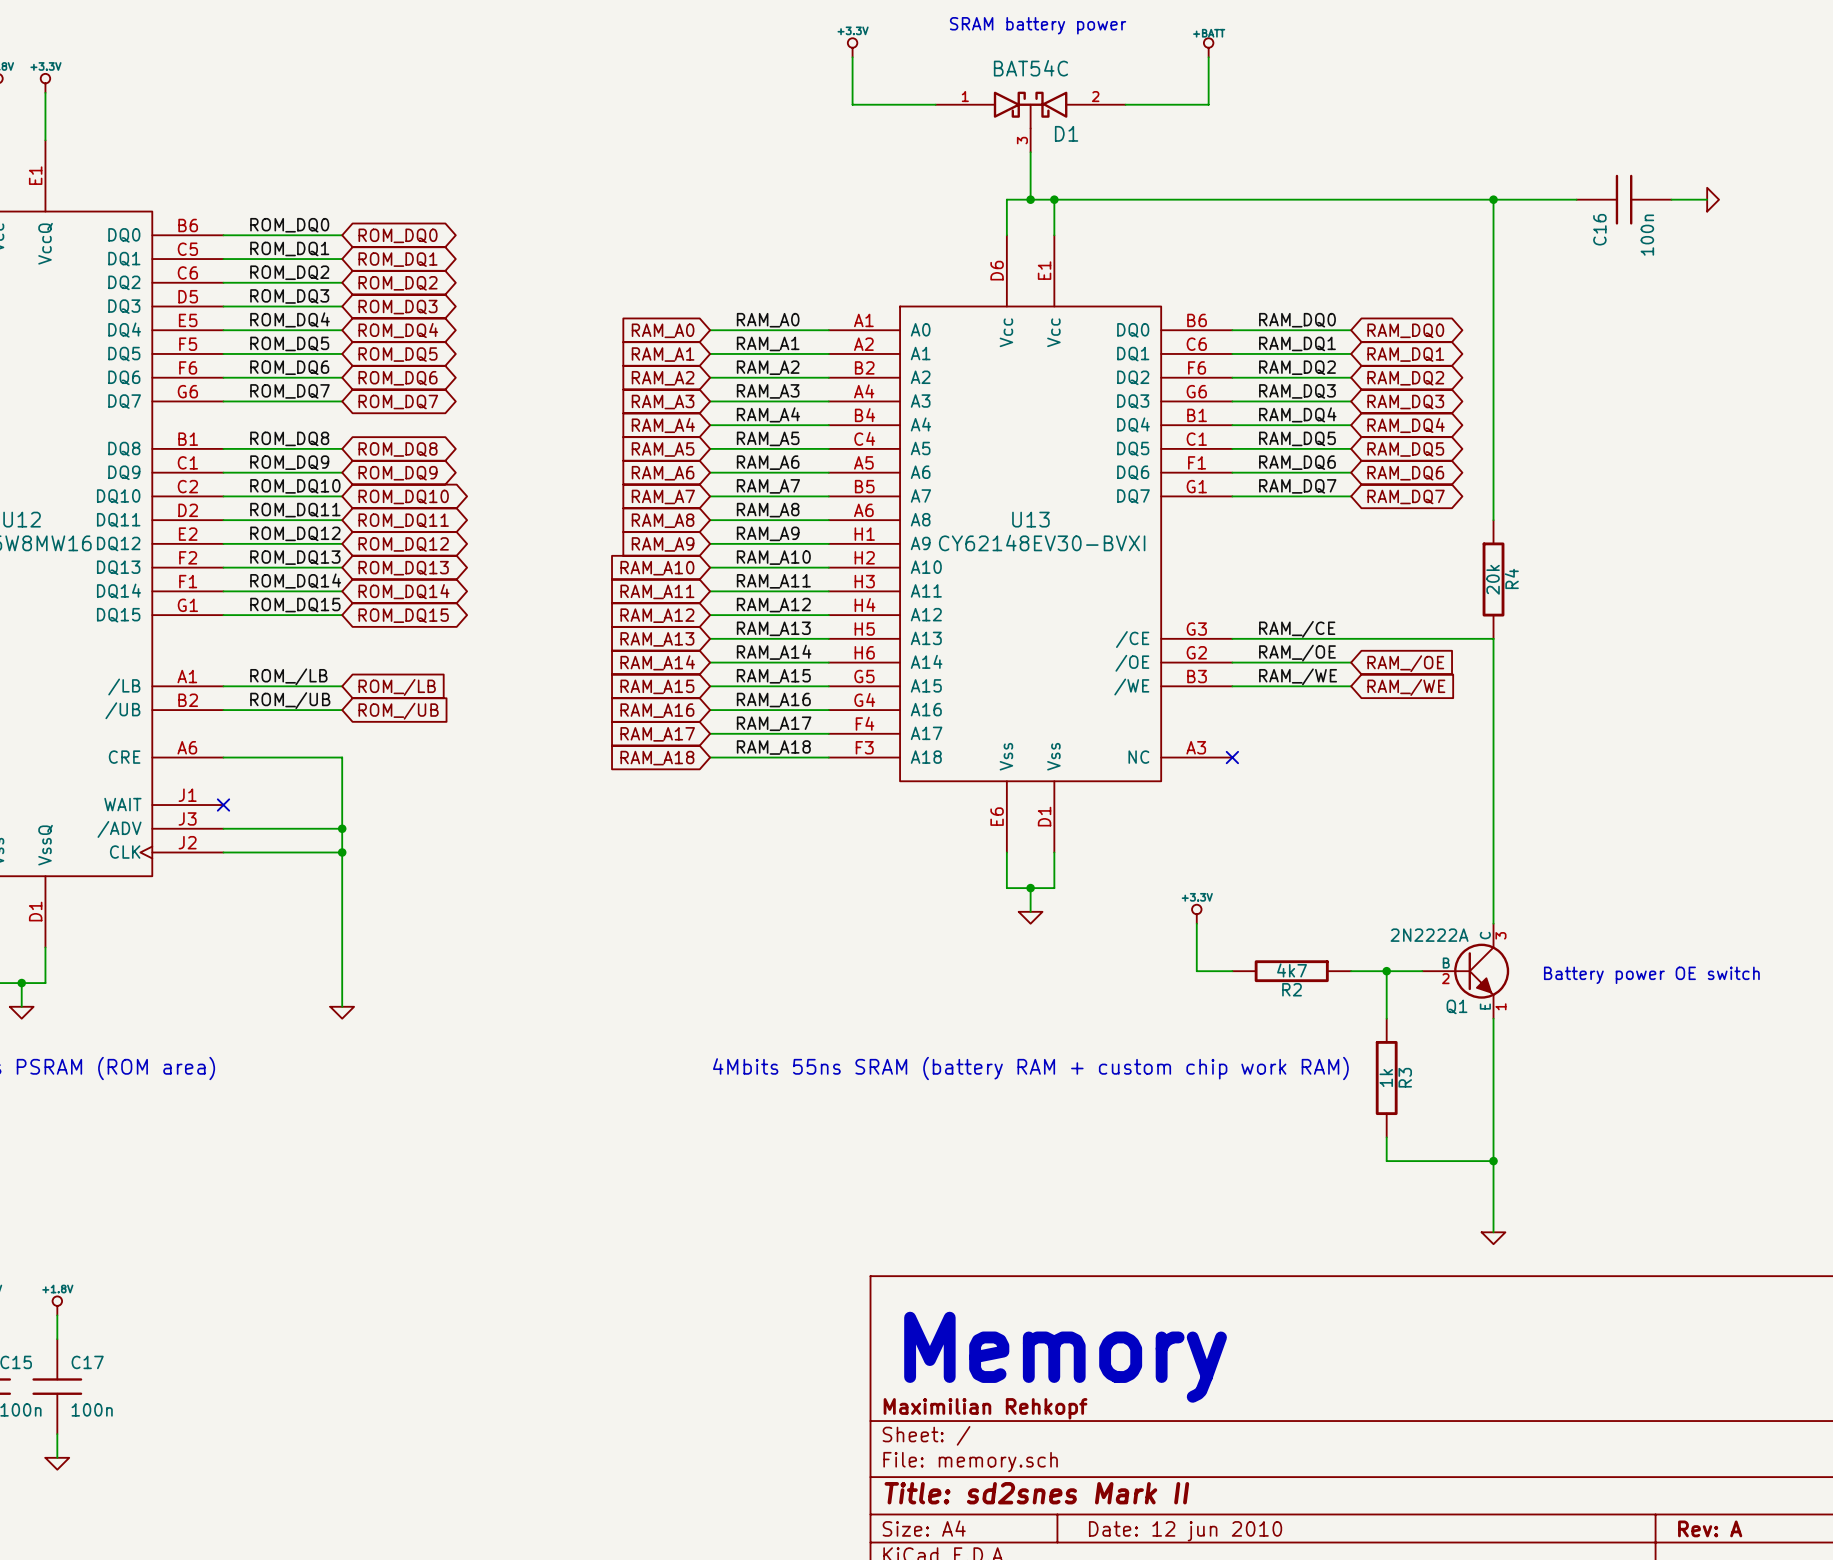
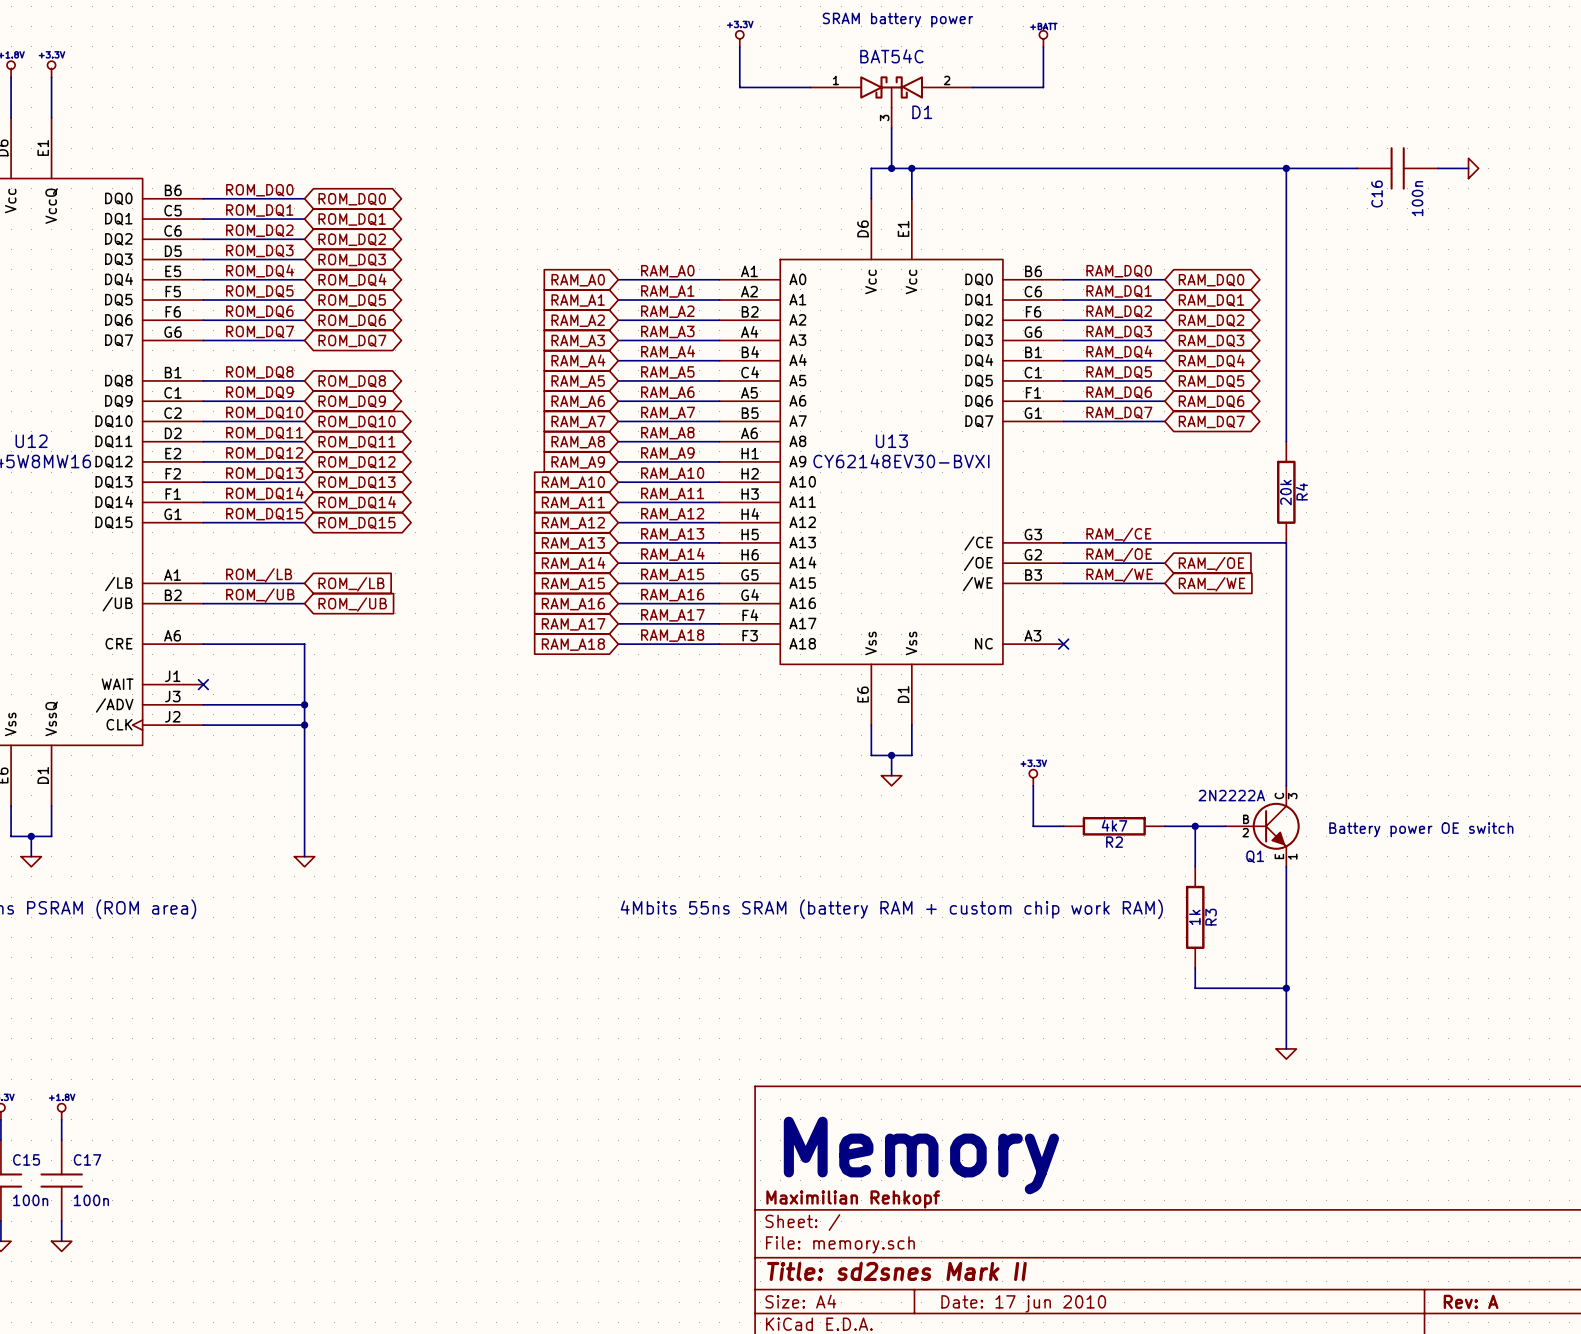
title block: Date: 12 jun 2010 (1185, 1531) -> Date: 17 jun 2010 (1023, 1303)

